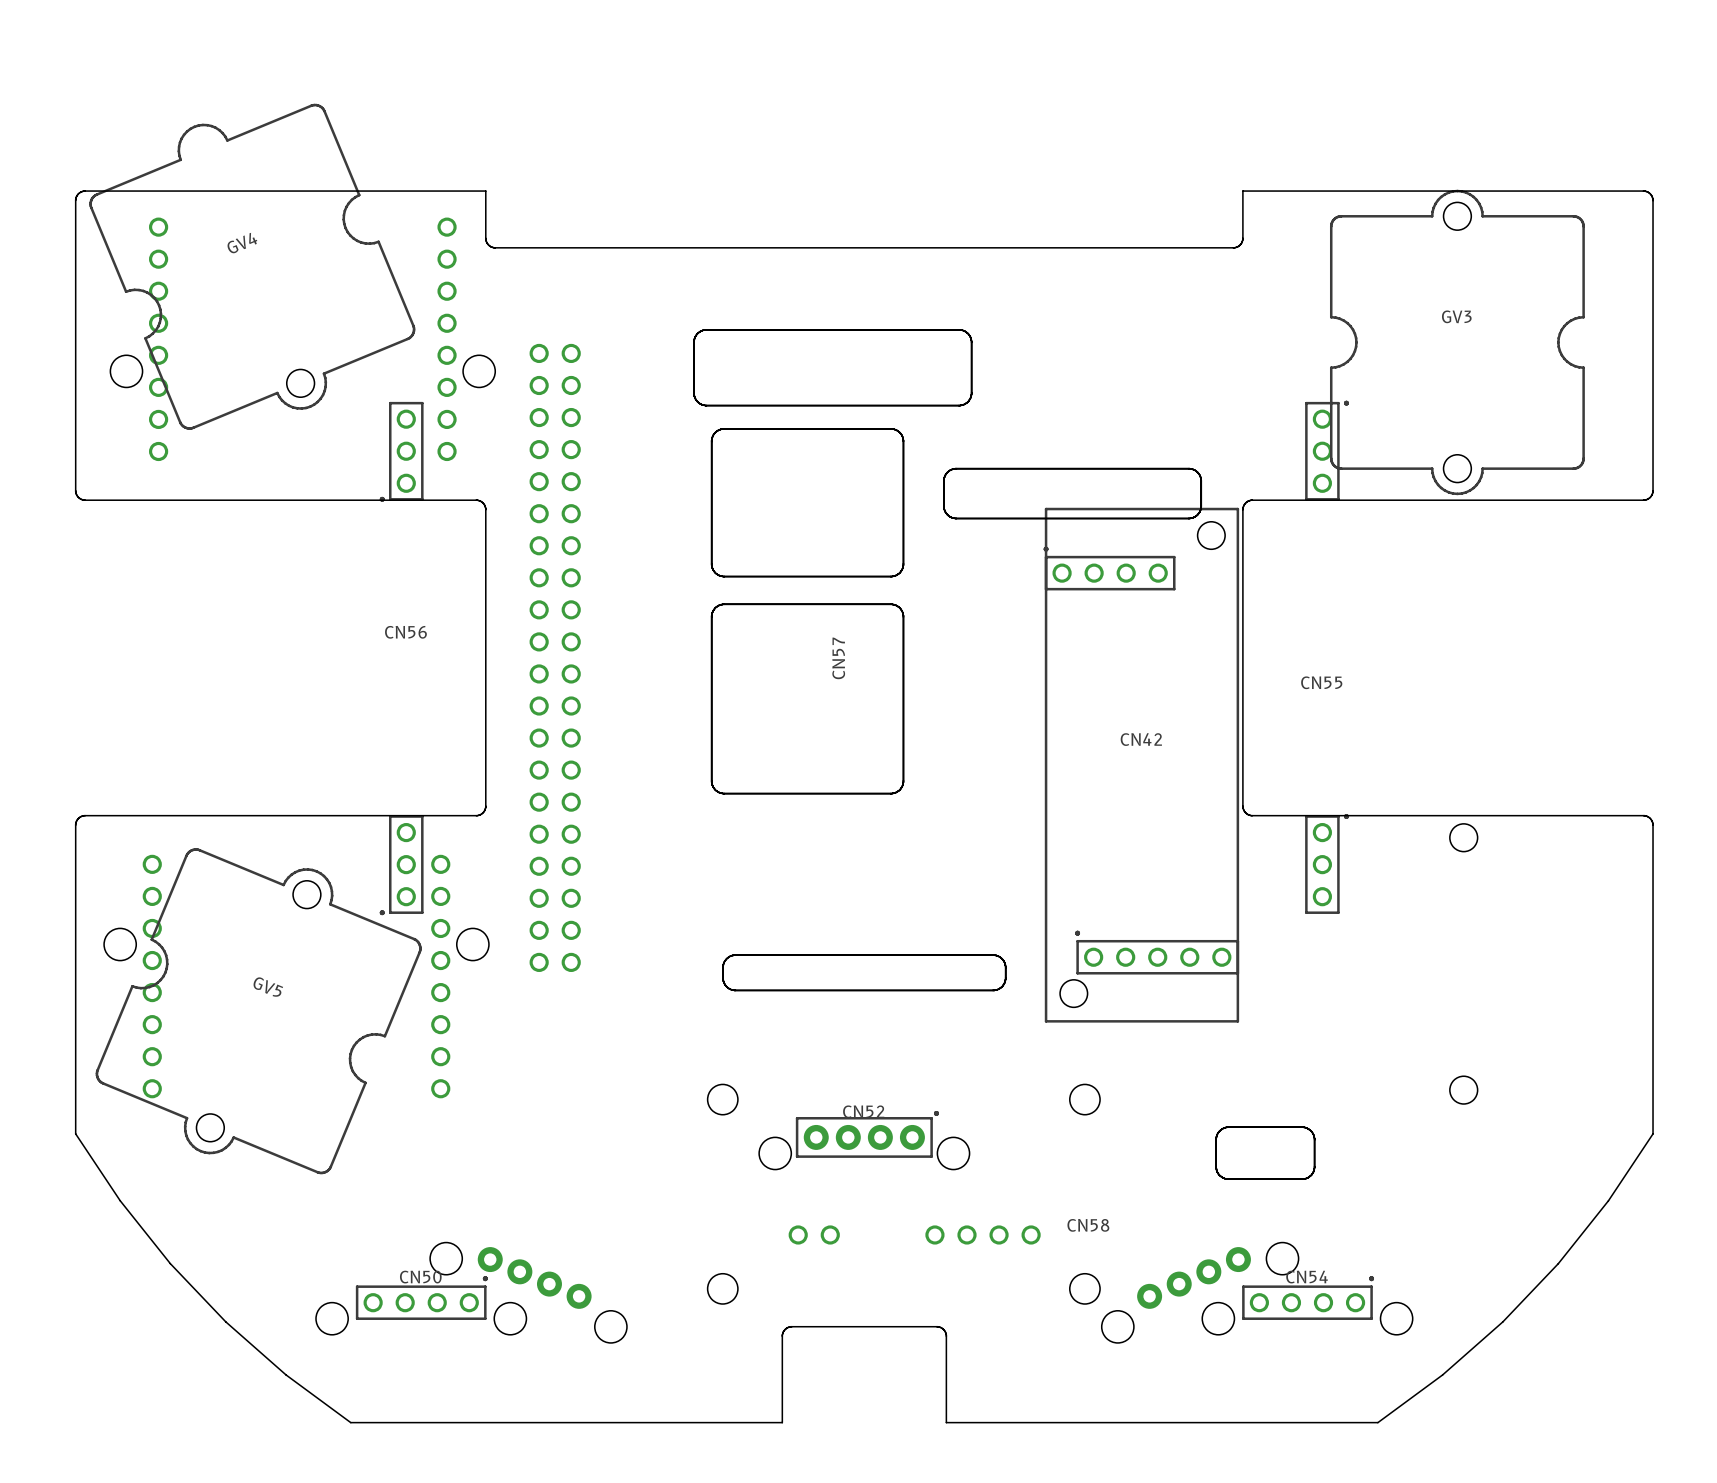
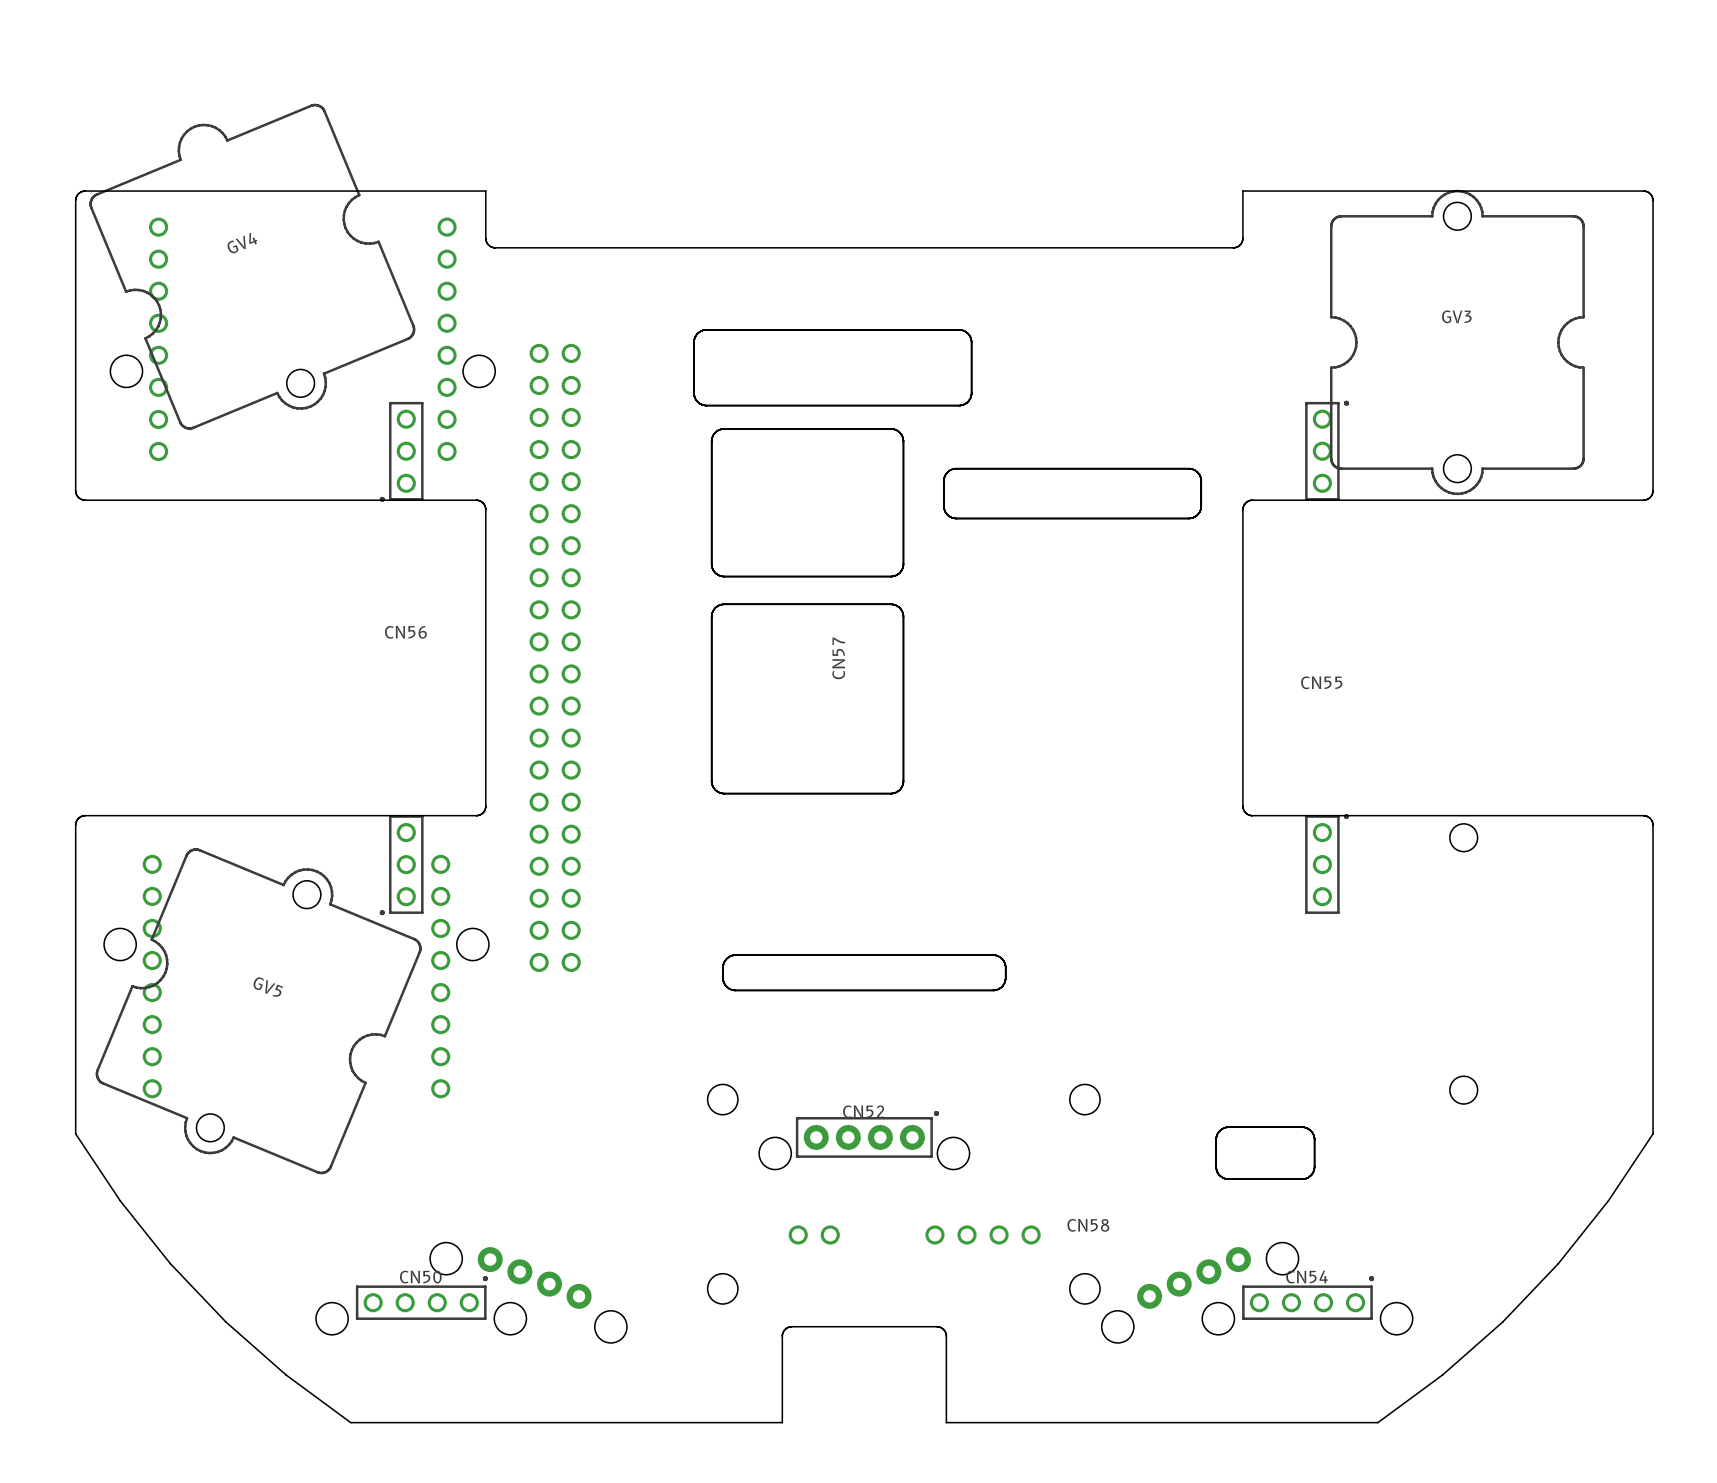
CN42: (1141, 765) -> none

